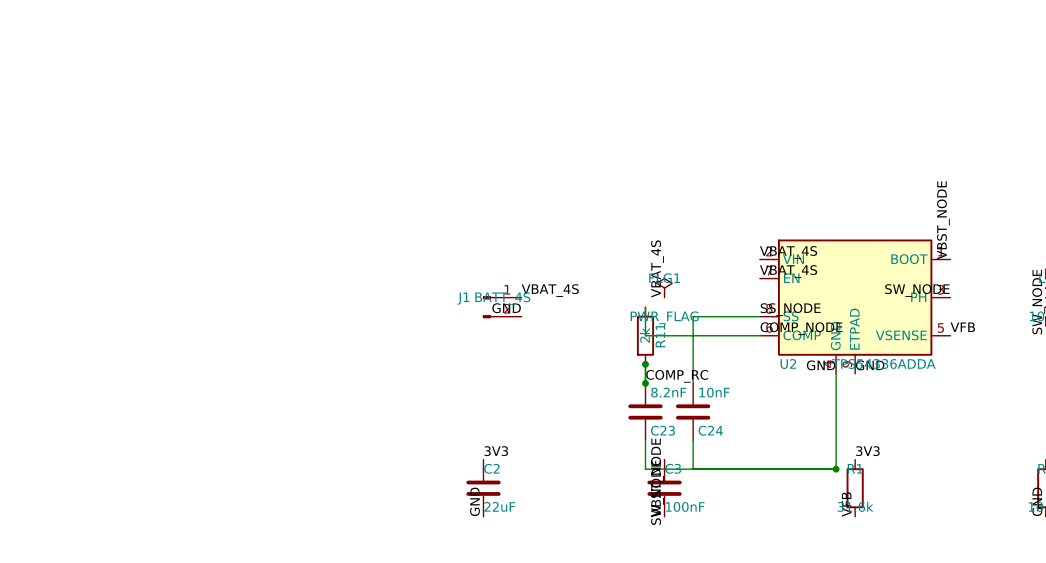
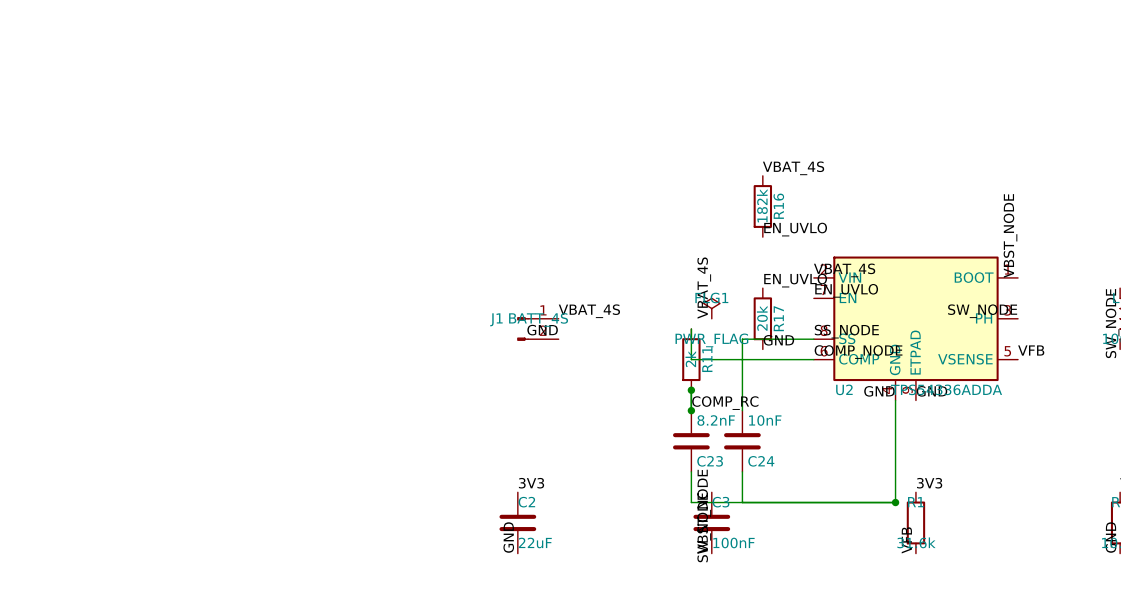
label: none -> VBAT_4S (793, 168)
R16: none -> 182k (762, 206)
label: none -> EN_UVLO (795, 229)
label: none -> EN_UVLO (795, 280)
label: VBAT_4S (788, 271) -> EN_UVLO (846, 290)
R17: none -> 20k (762, 318)
label: none -> GND (778, 340)

